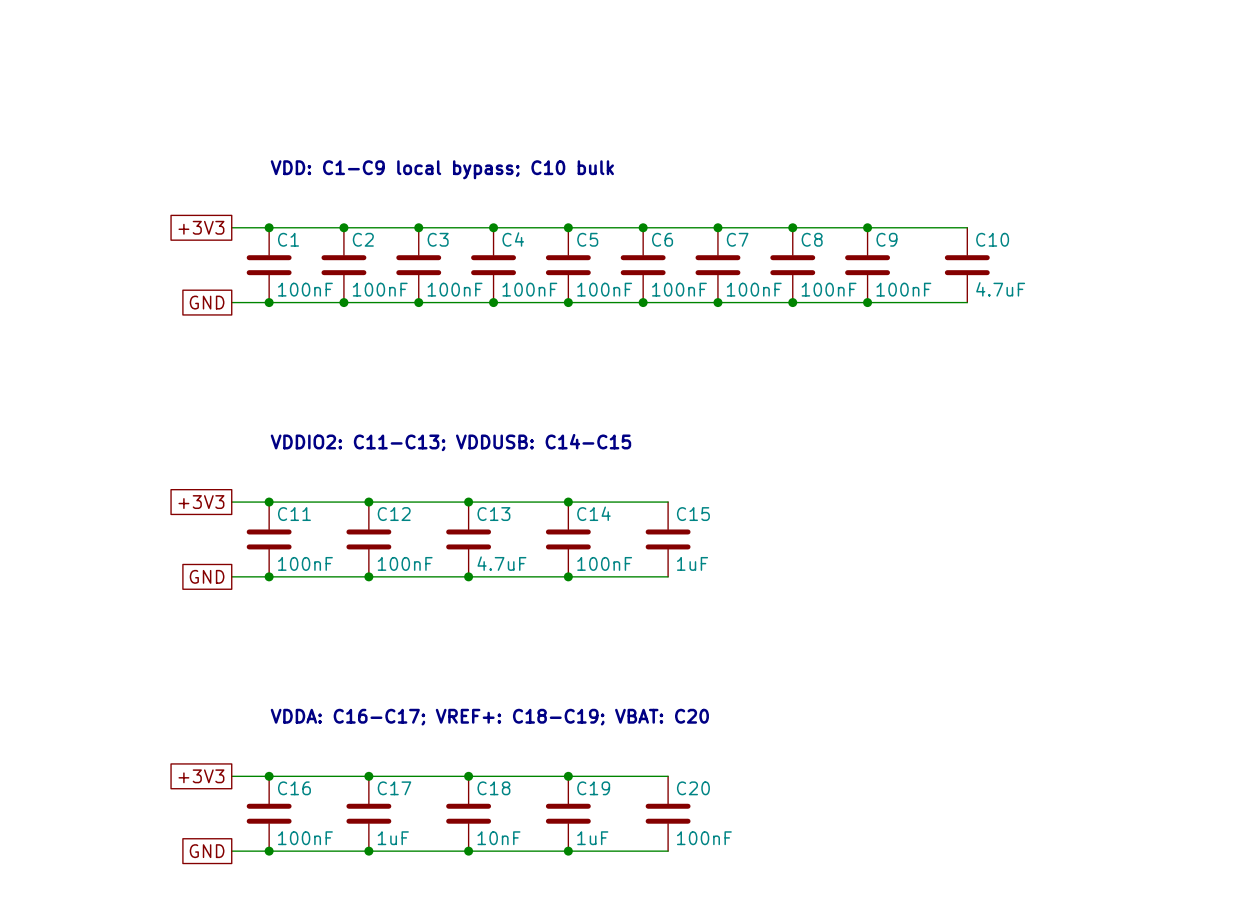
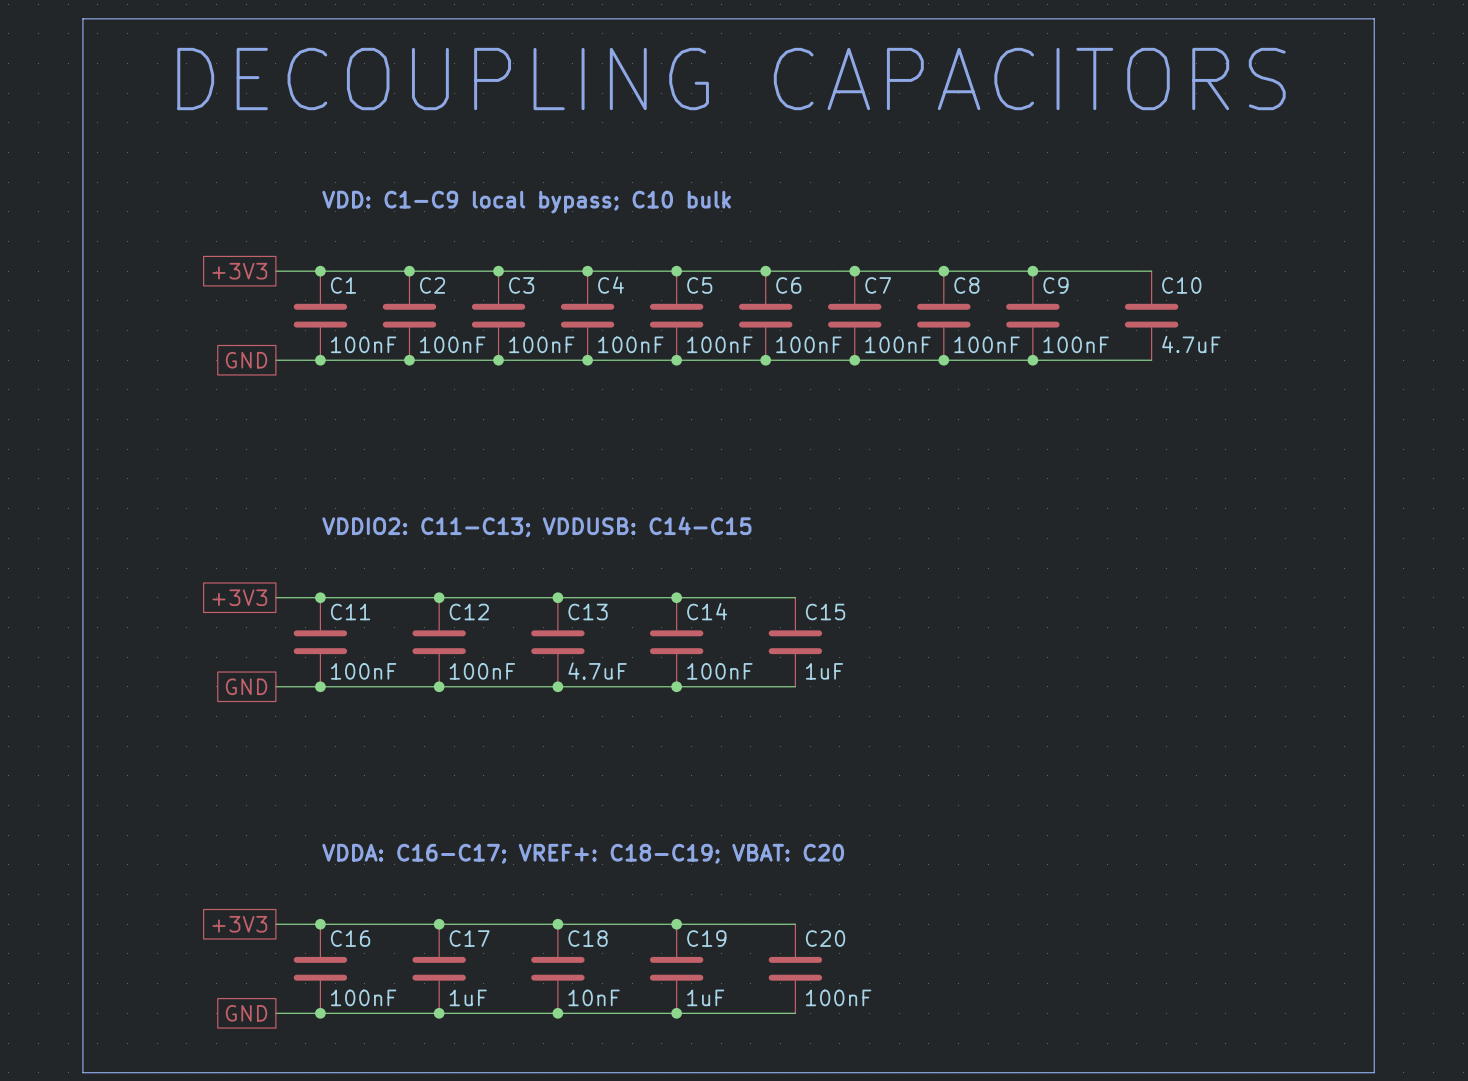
line: none -> (82, 18) (1374, 18) (1374, 1072) (82, 1072) (82, 18)
text: none -> DECOUPLING CAPACITORS (731, 79)

